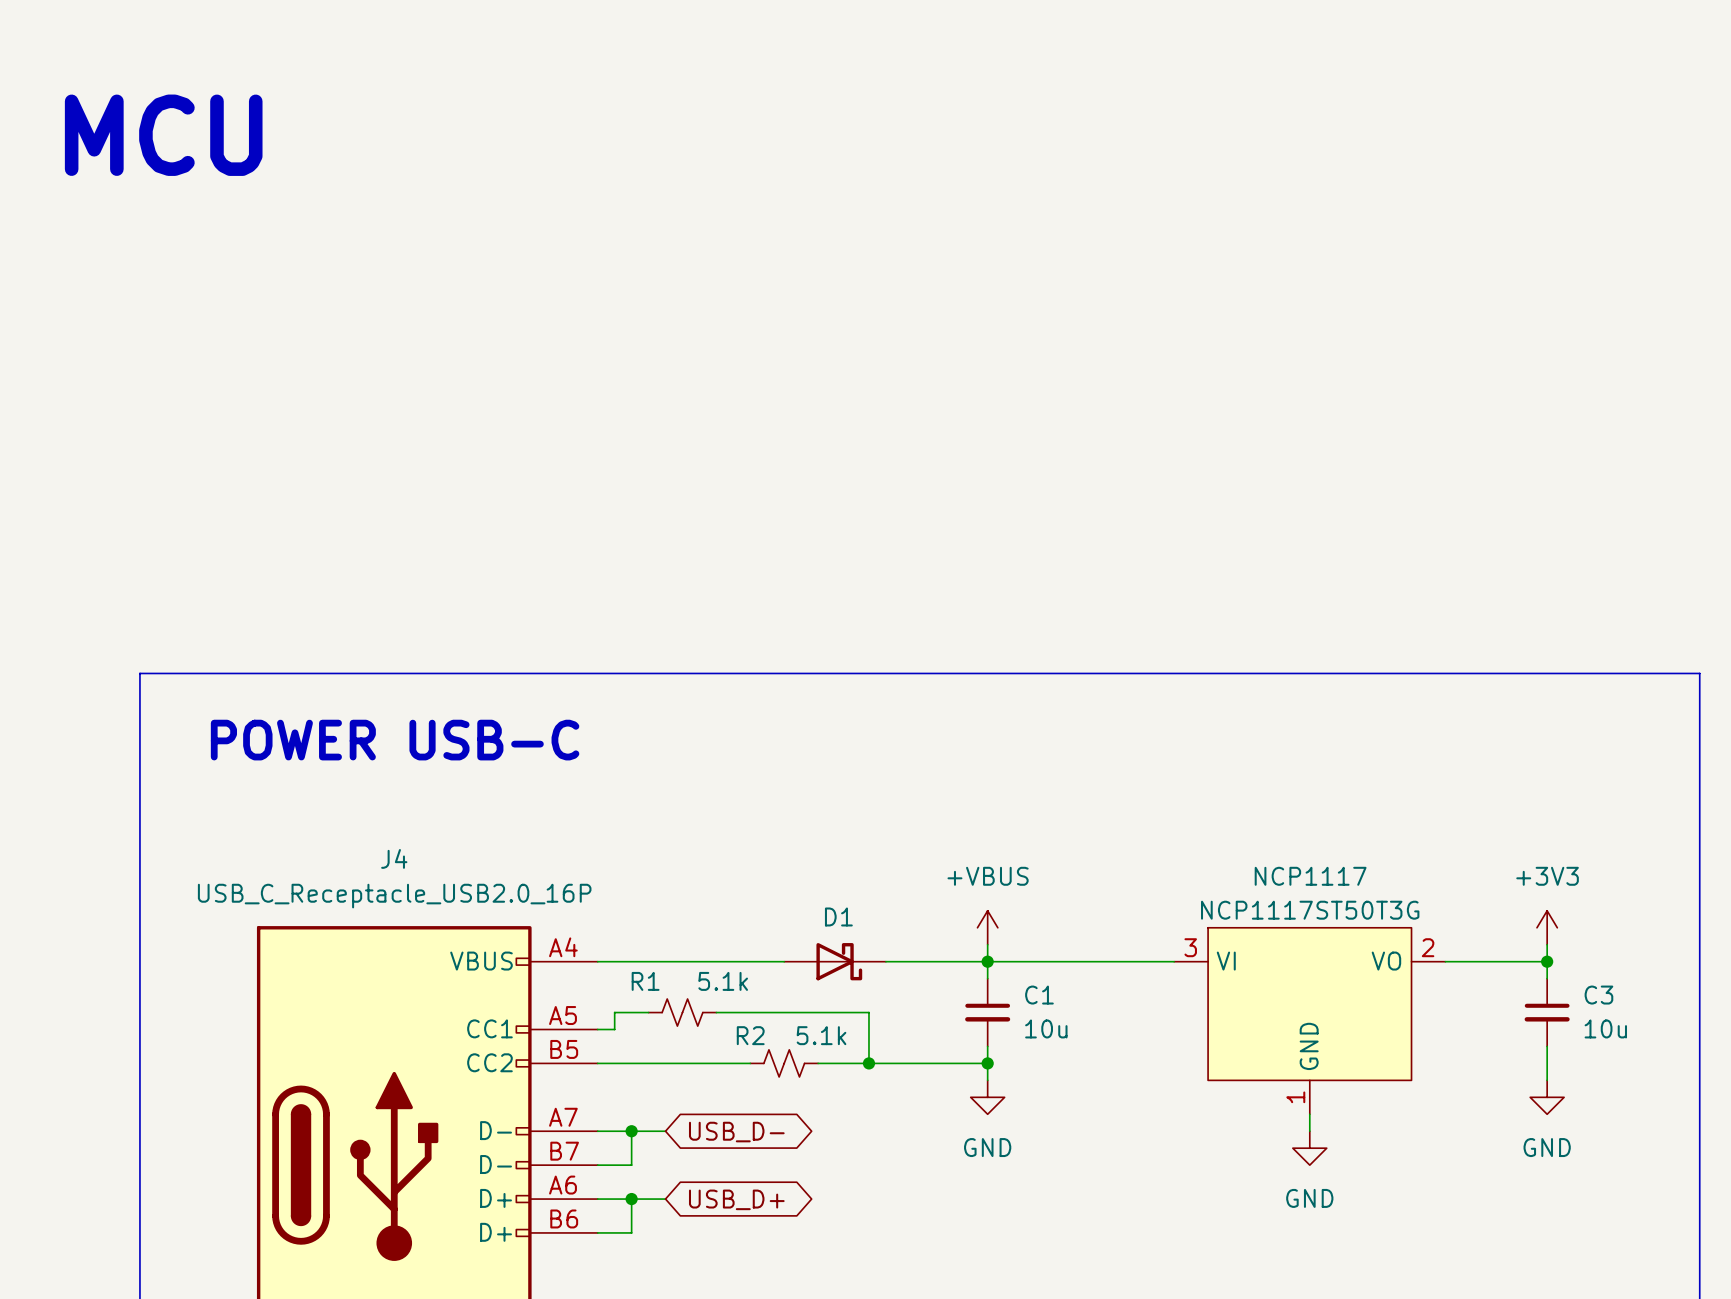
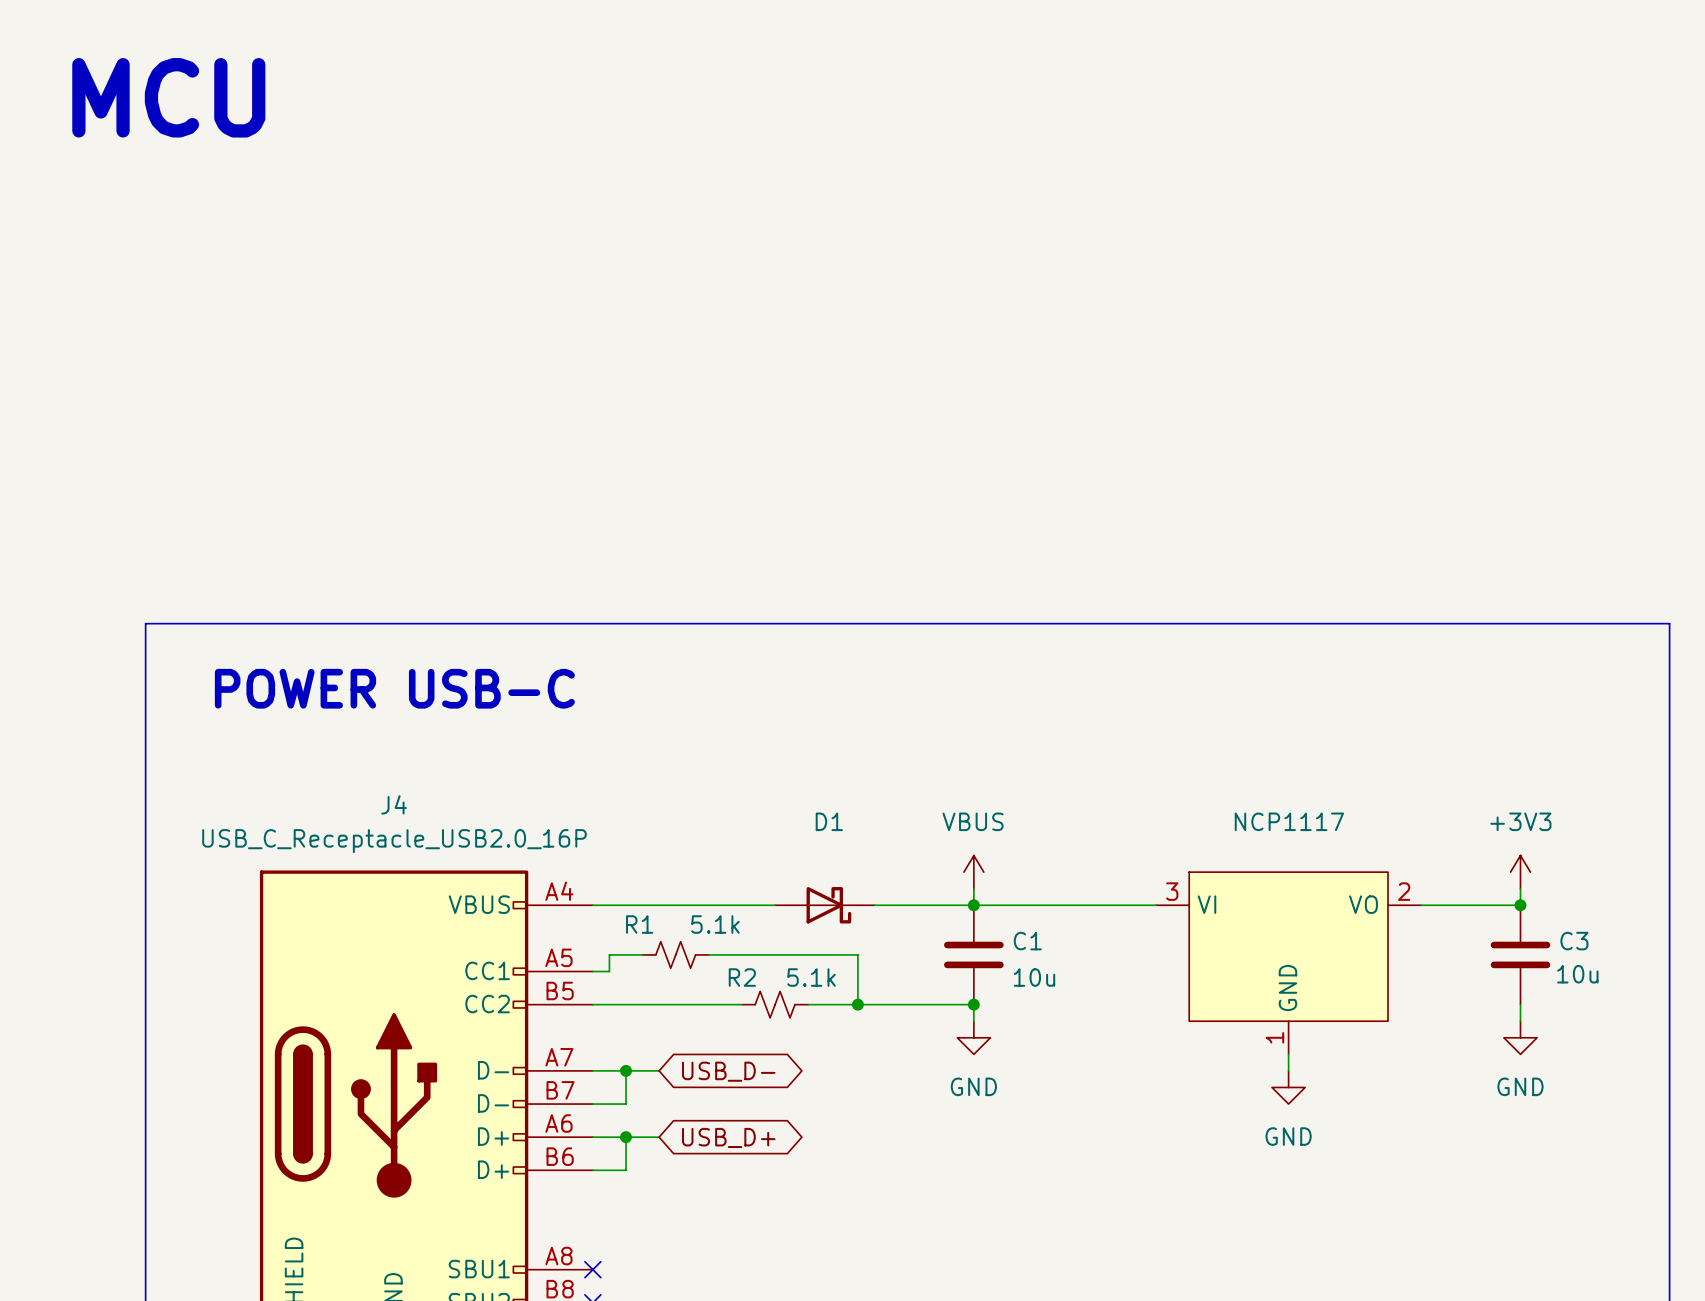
NCP1117 value: NCP1117ST50T3G (1310, 910) -> none
D1 name position: D1 (838, 916) -> D1 (829, 821)
power symbol: +VBUS (987, 927) -> VBUS (973, 872)
C1 symbol: [965, 978, 1011, 1047] -> [944, 905, 1004, 1005]
C3 symbol: [1524, 978, 1570, 1047] -> [1490, 905, 1551, 1005]

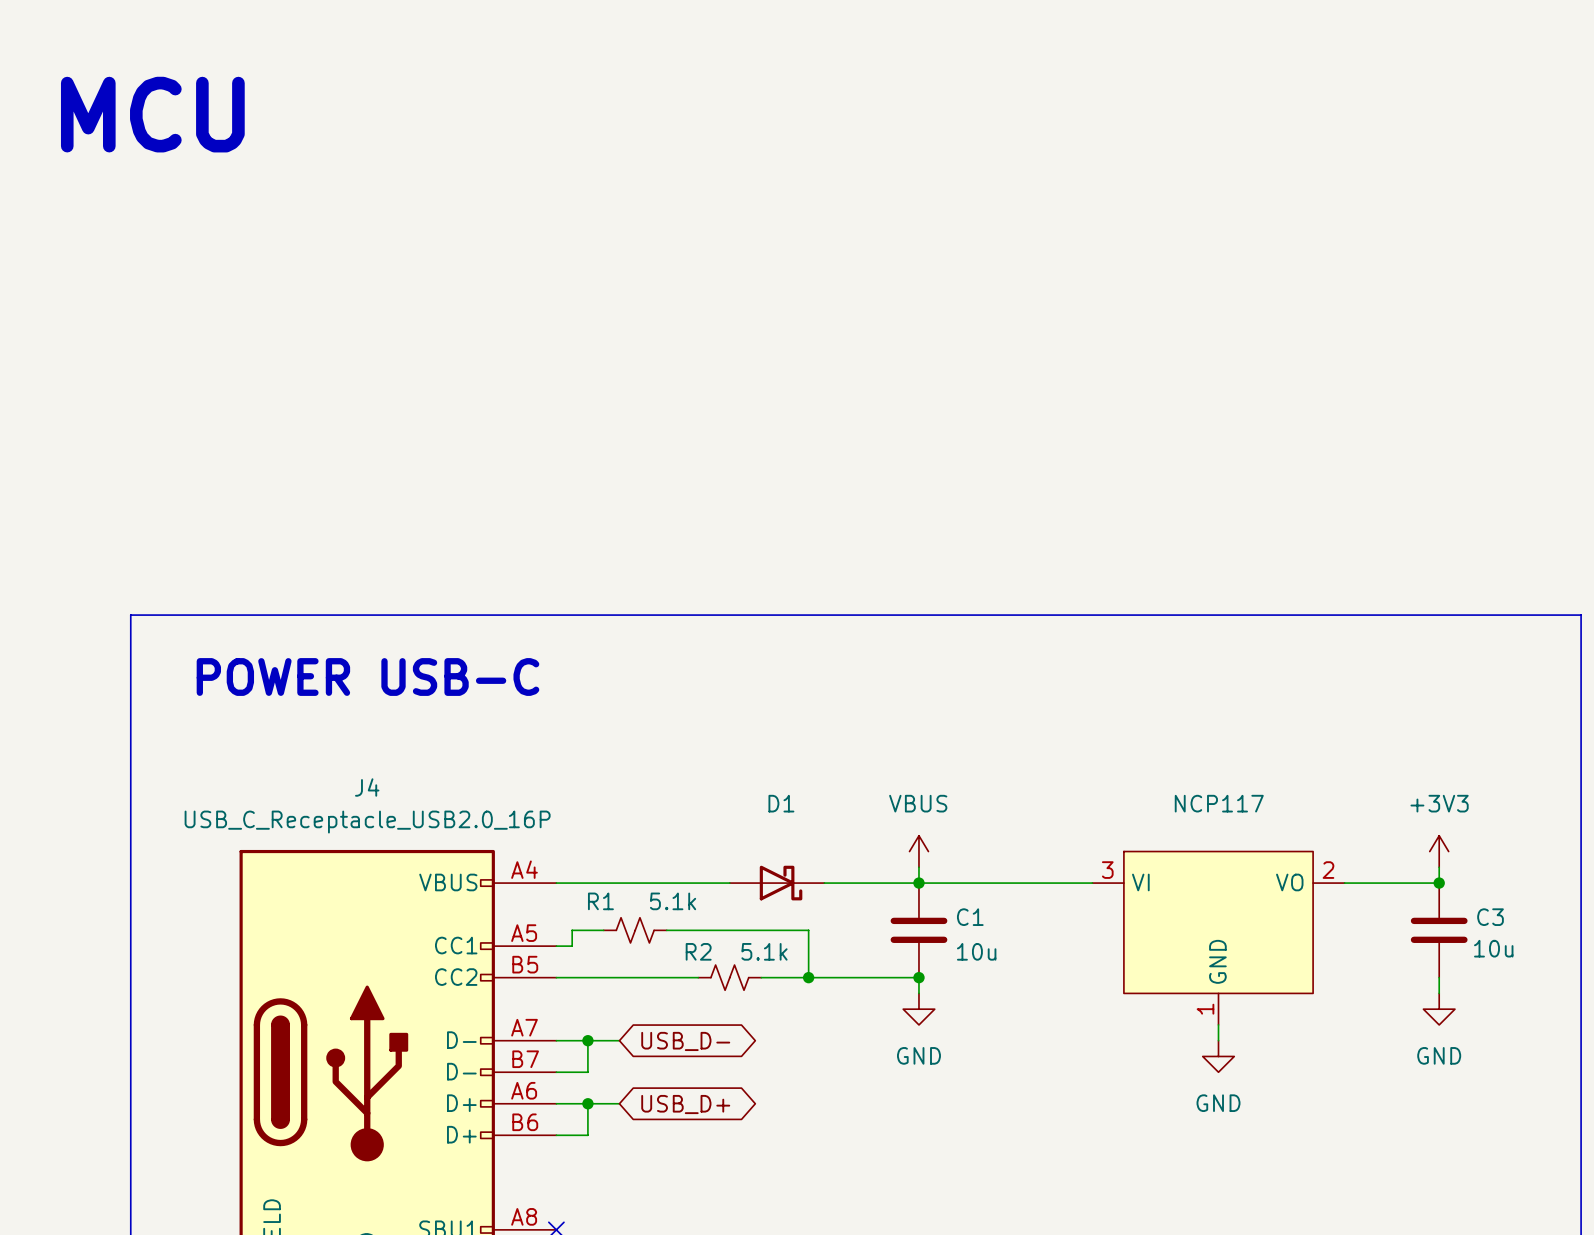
NCP1117 name: NCP1117 (1289, 821) -> NCP117 (1219, 803)

